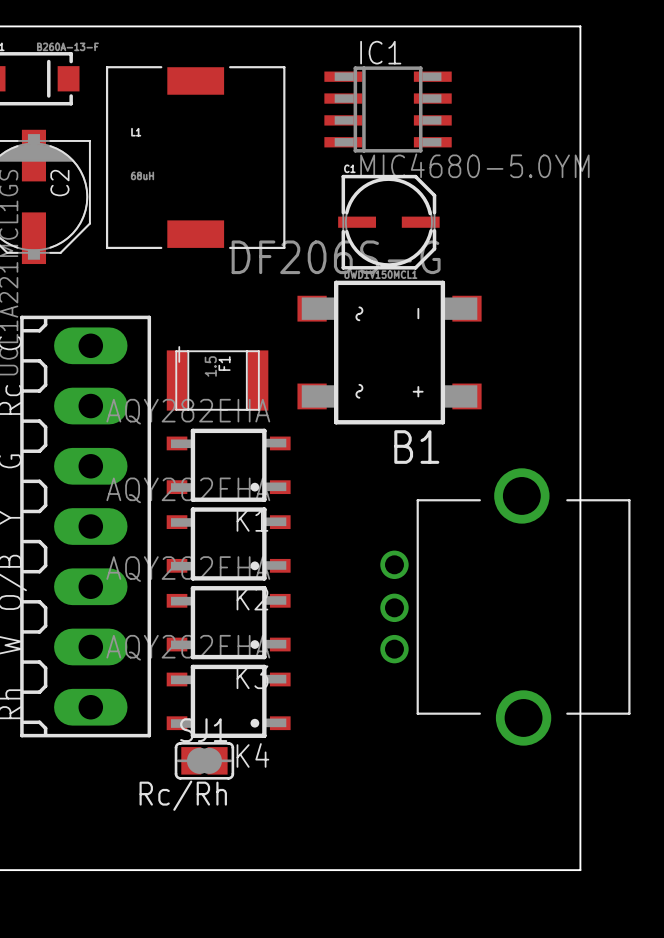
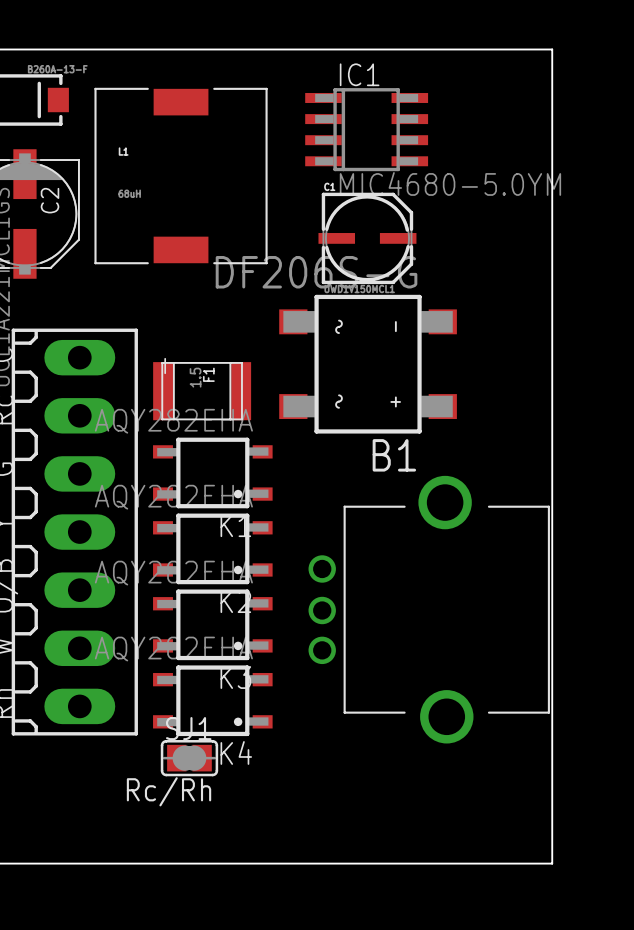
part position: (505, 606) -> (429, 609)

